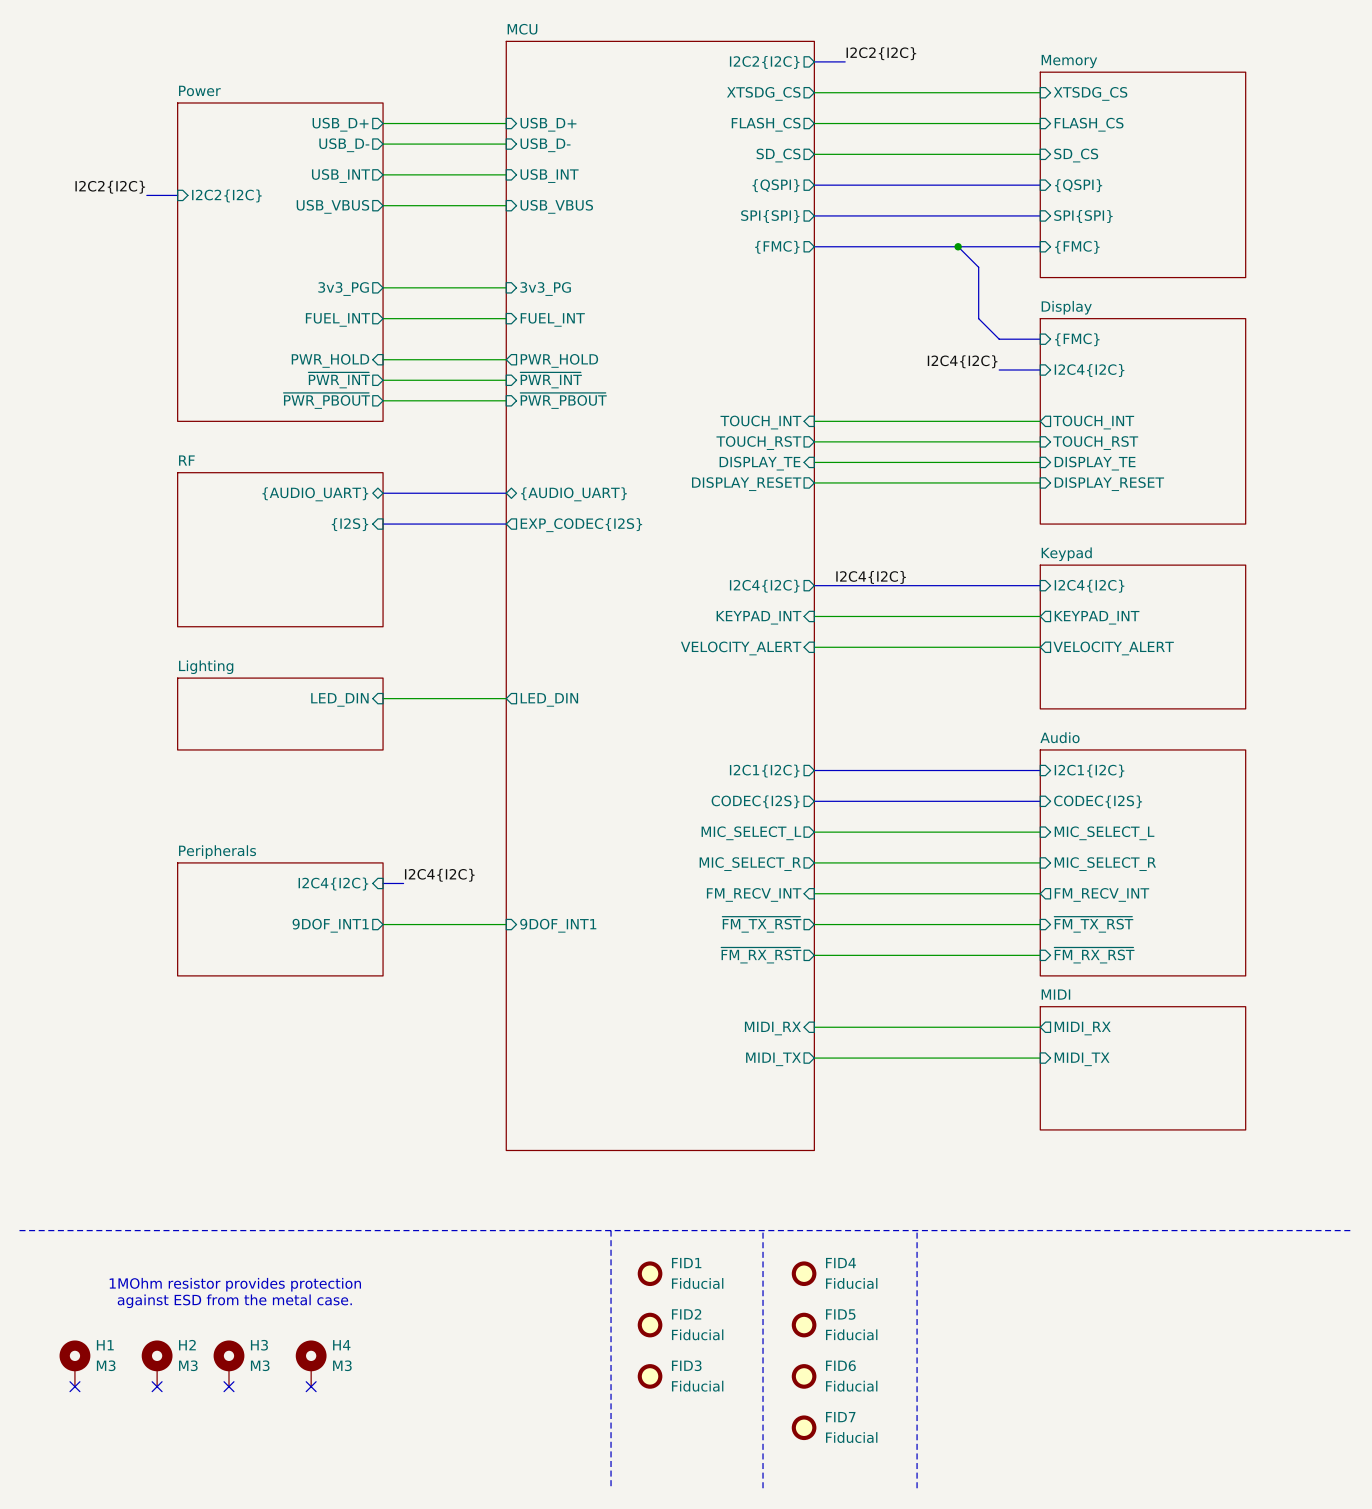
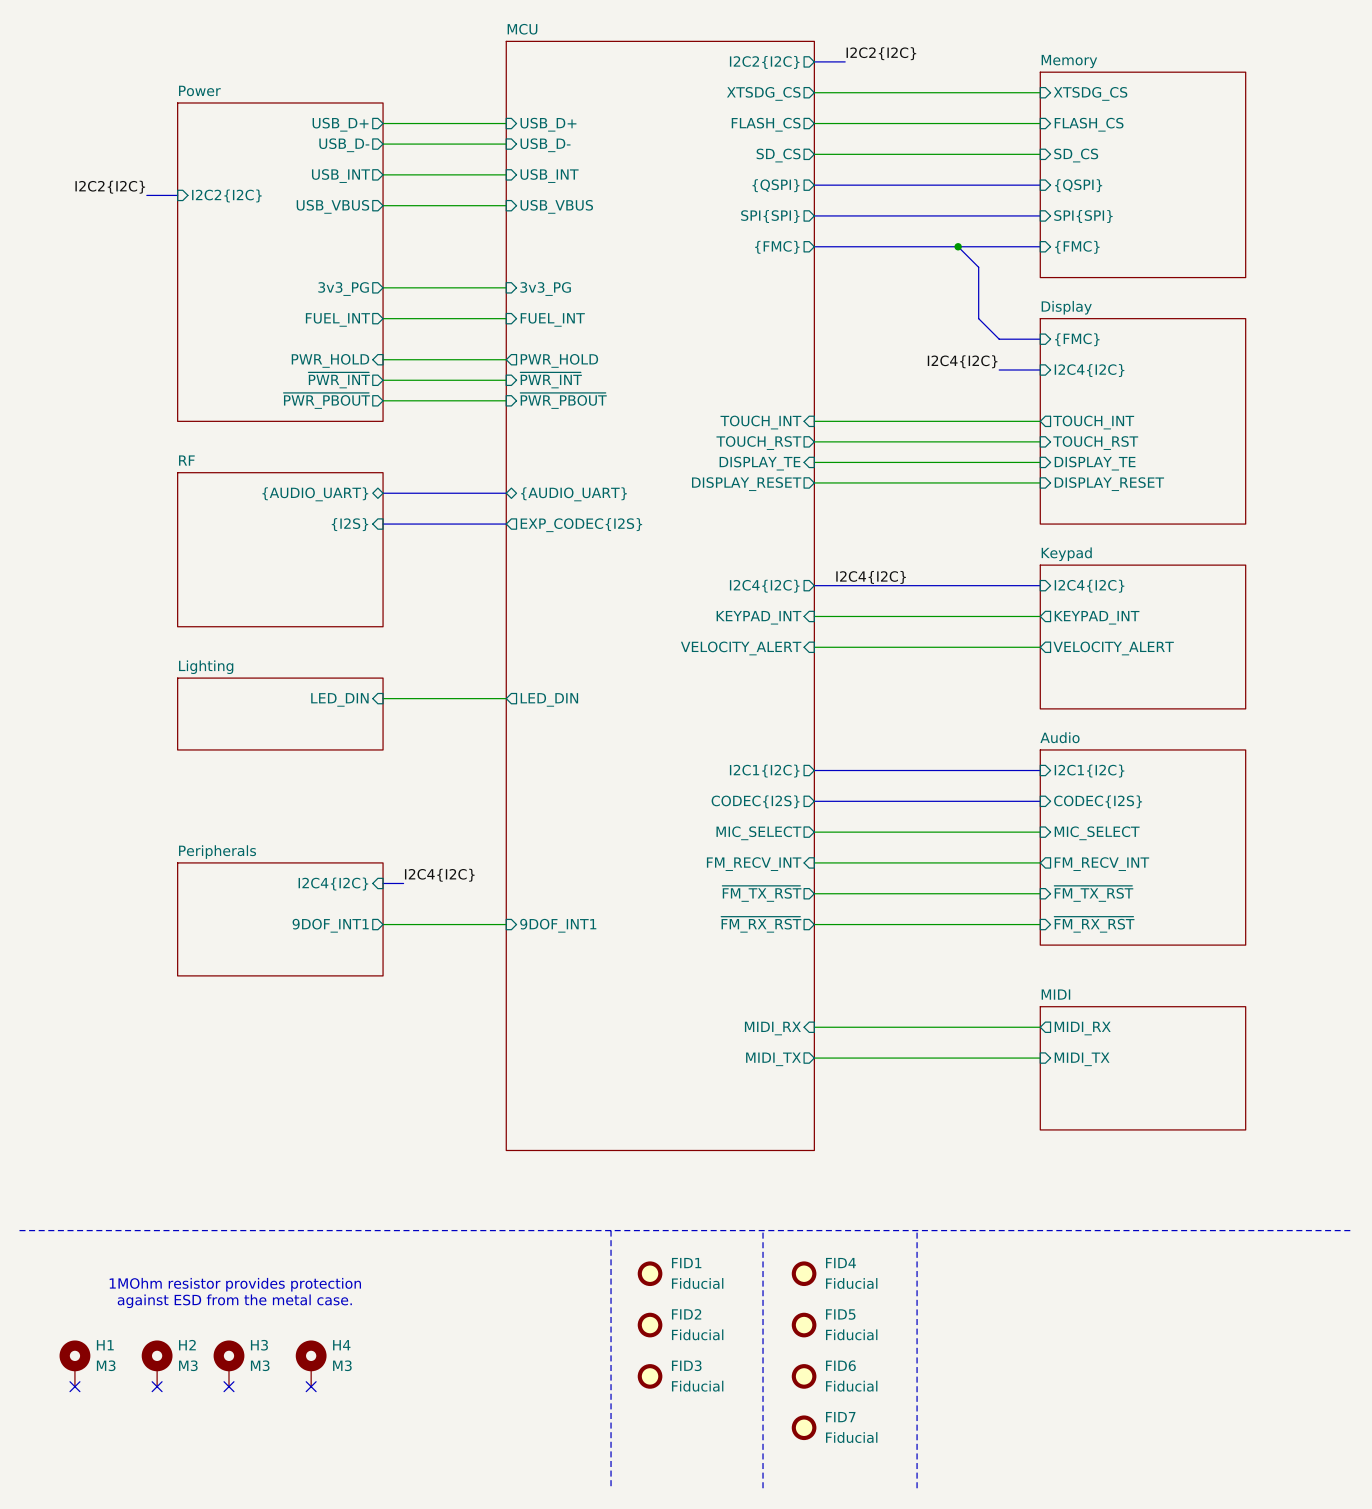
sheet pin: MIC_SELECT_L (751, 833) -> MIC_SELECT (758, 833)
sheet pin: MIC_SELECT_L (1104, 833) -> MIC_SELECT (1097, 833)
sheet Audio: none -> (1142, 847)
sheet Audio: (1142, 862) -> none
sheet pin shape: output (750, 864) -> input (754, 864)
sheet pin: MIC_SELECT_R (750, 864) -> FM_RECV_INT (754, 864)
sheet pin shape: input (1105, 864) -> output (1101, 864)
sheet pin: MIC_SELECT_R (1105, 864) -> FM_RECV_INT (1101, 864)
sheet pin shape: input (754, 894) -> output (761, 893)
sheet pin: FM_RECV_INT (754, 894) -> ~{FM_TX_RST} (761, 893)
sheet pin shape: output (1101, 894) -> input (1093, 893)
sheet pin: FM_RECV_INT (1101, 894) -> ~{FM_TX_RST} (1093, 893)
sheet pin: ~{FM_TX_RST} (761, 924) -> ~{FM_RX_RST} (761, 924)
sheet pin: ~{FM_TX_RST} (1093, 924) -> ~{FM_RX_RST} (1094, 924)
sheet pin: ~{FM_RX_RST} (761, 955) -> none
wire: (814, 955) (1040, 955) -> none
sheet pin: ~{FM_RX_RST} (1094, 955) -> none

